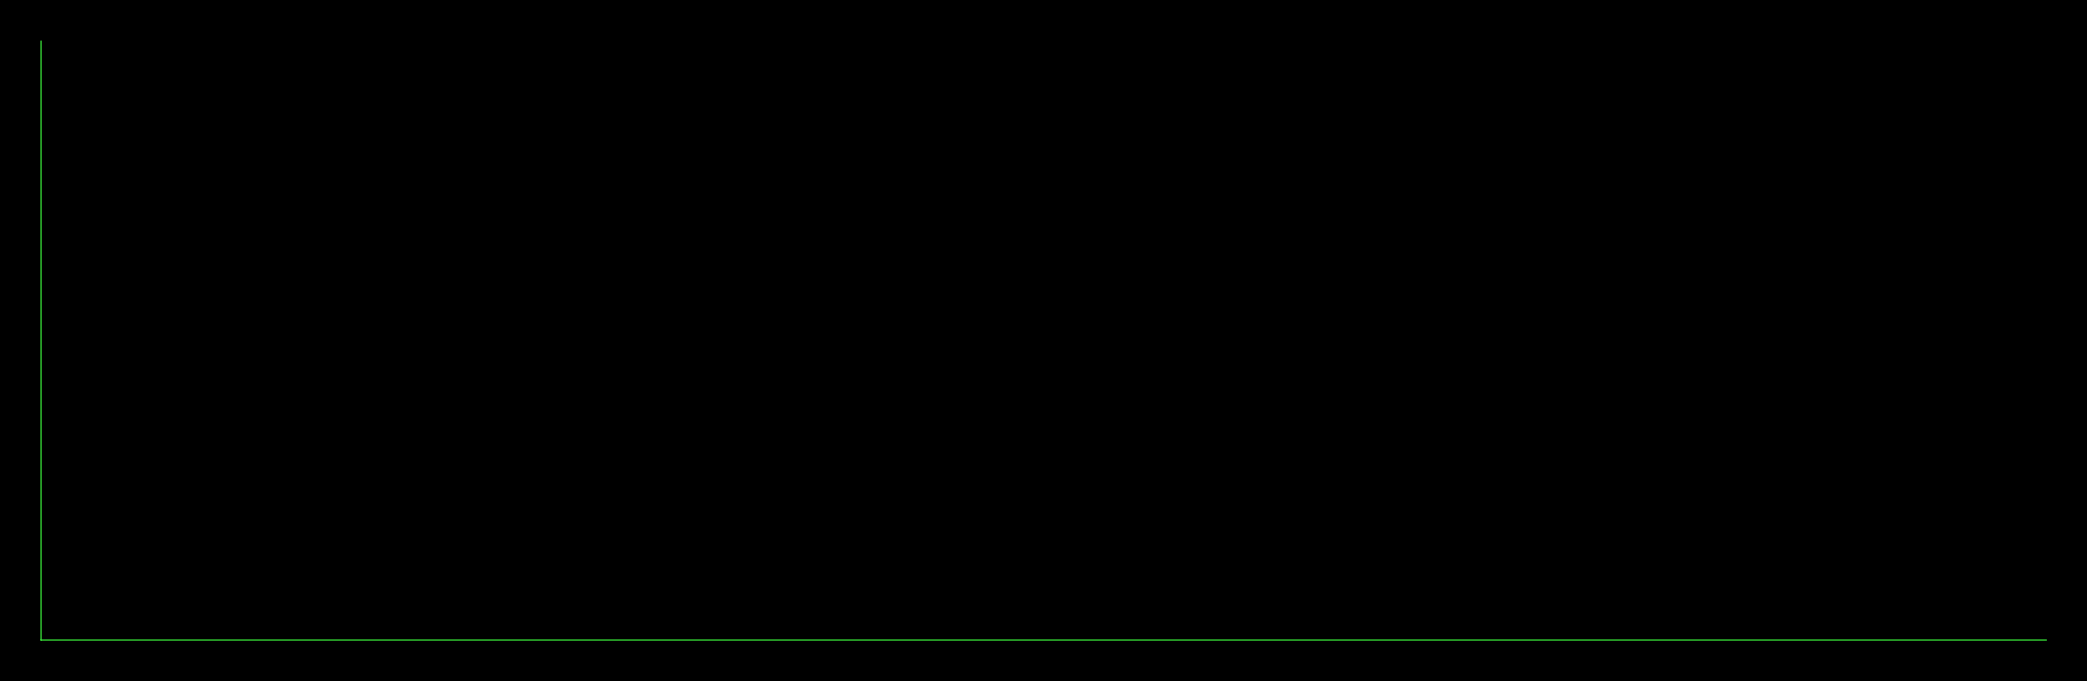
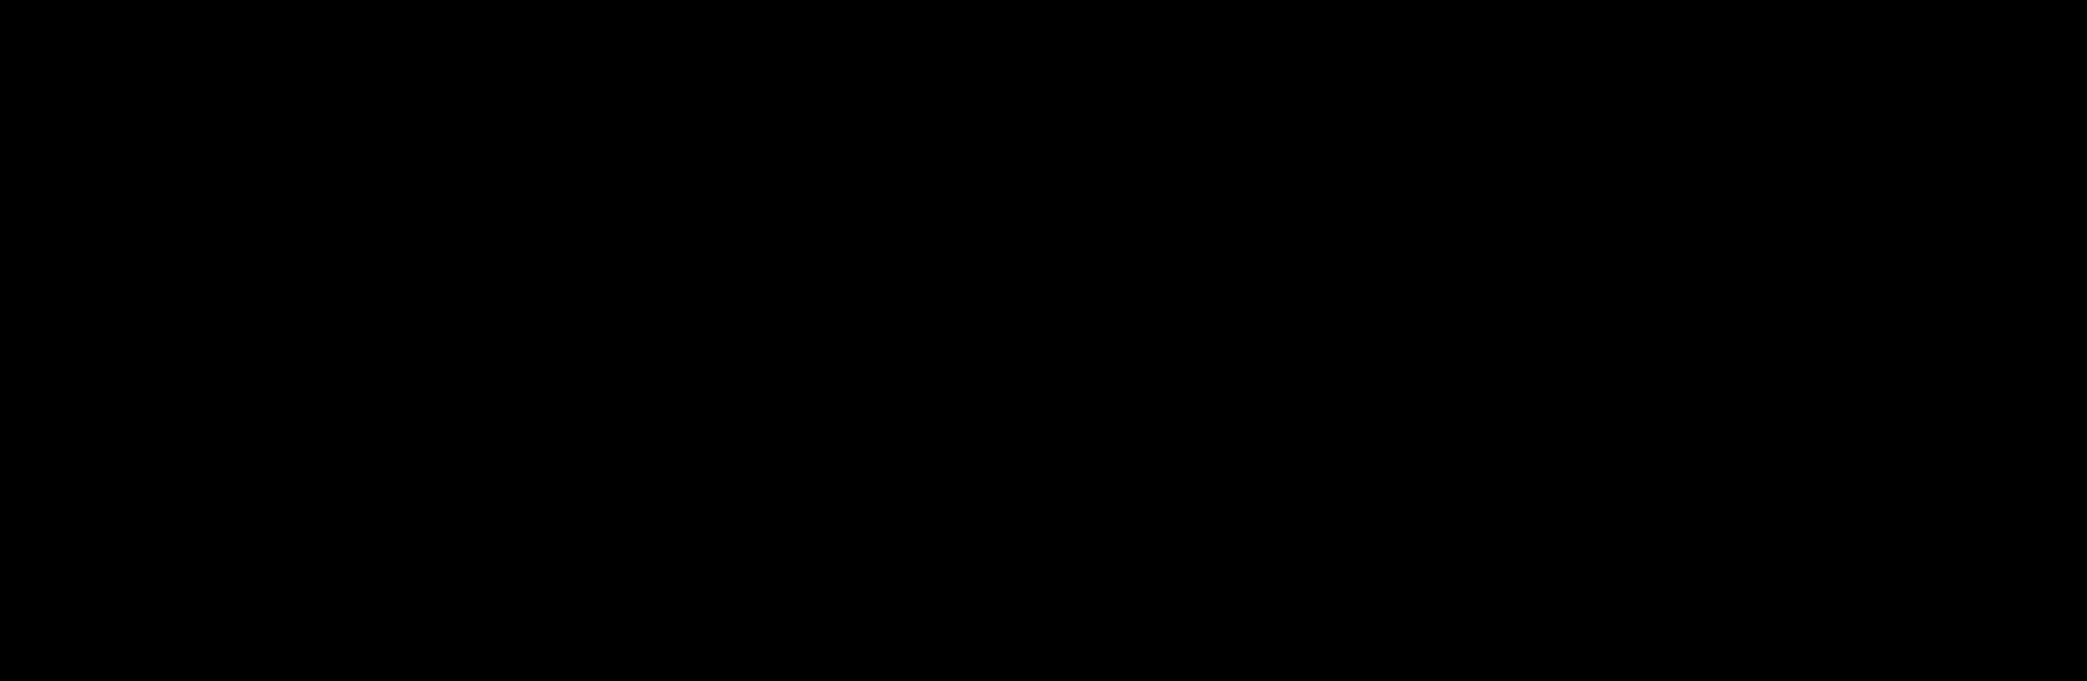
wire: (41, 41) (41, 640) (2046, 640) -> none

